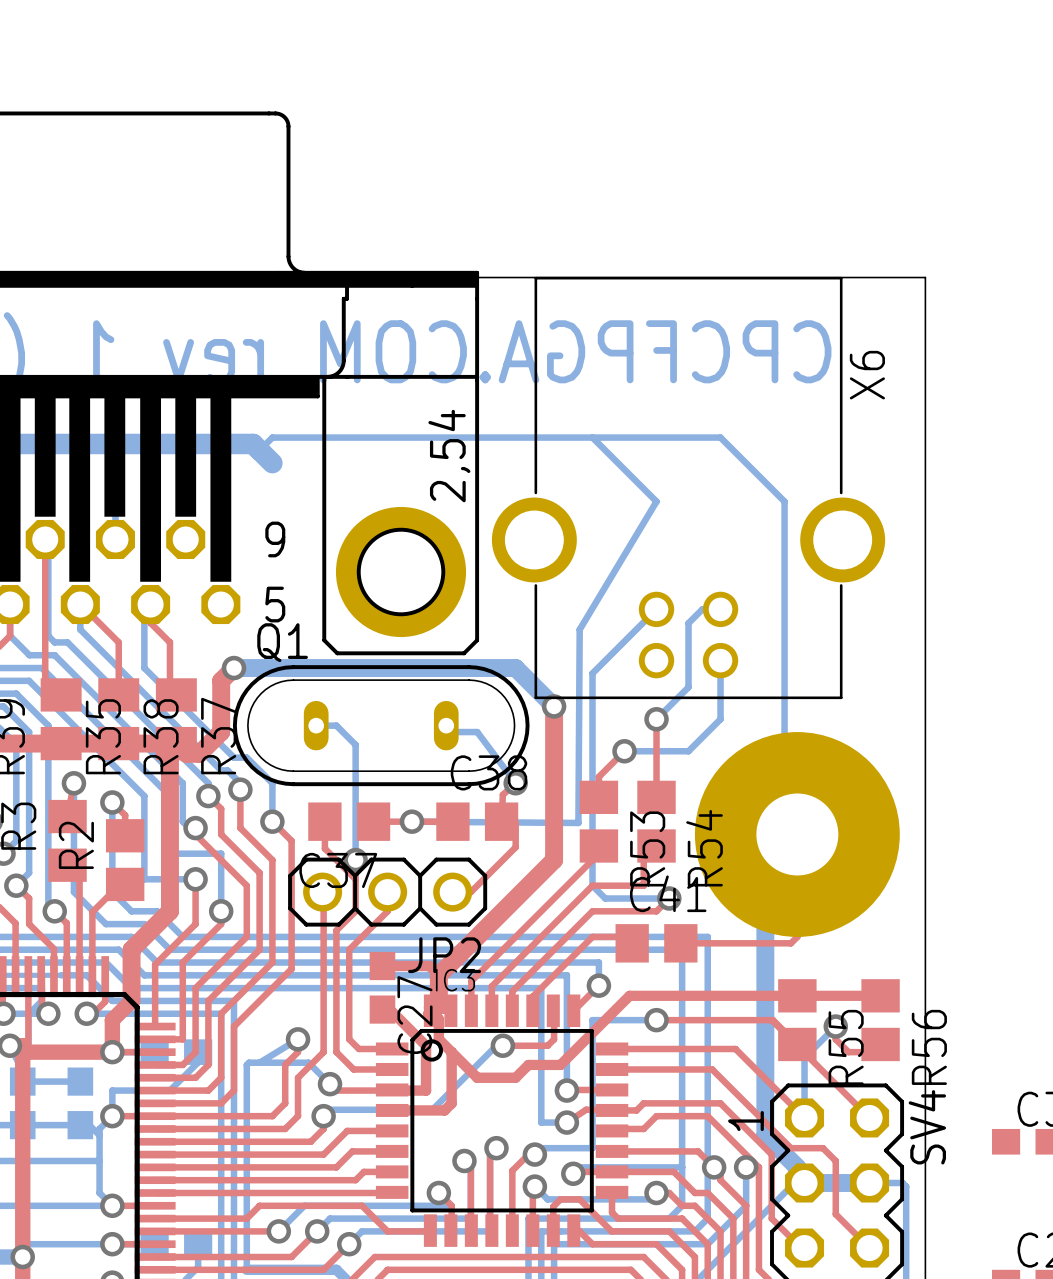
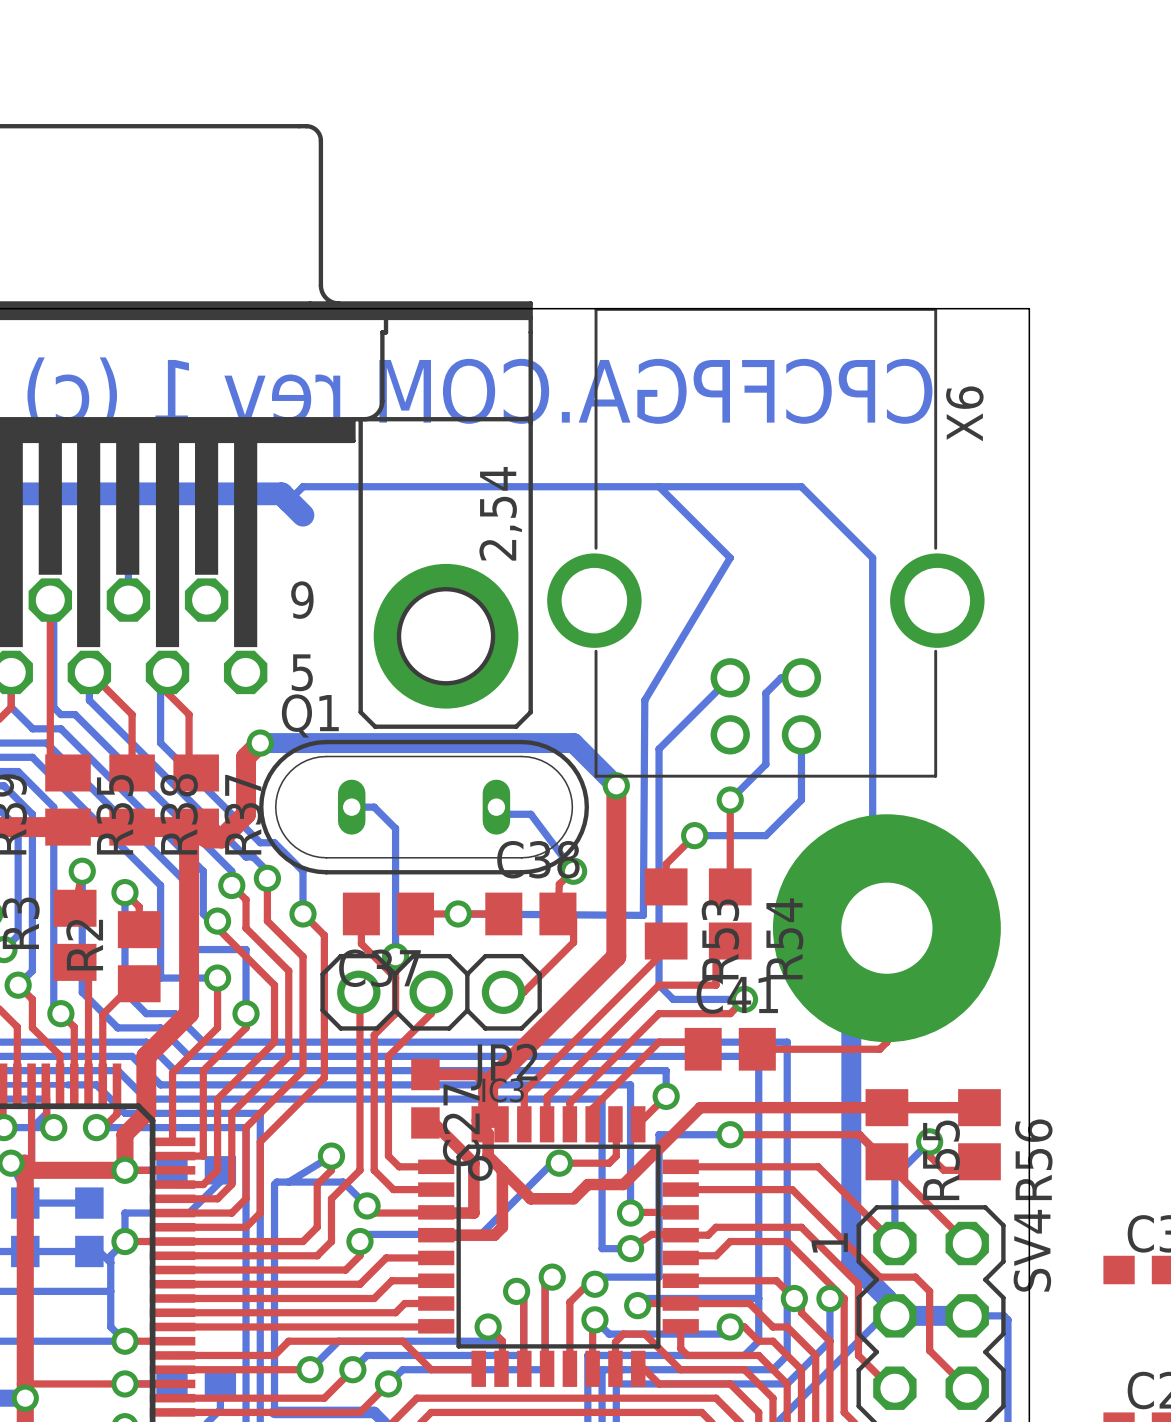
top track: none -> (25, 1383) (124, 1383)
bottom track: (112, 1244) (22, 1244) (22, 1257) -> none

